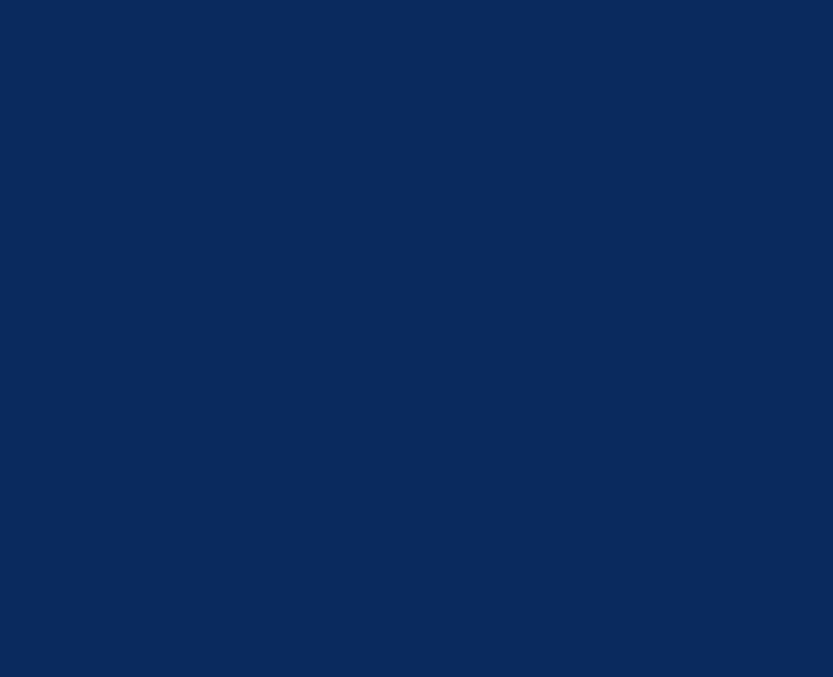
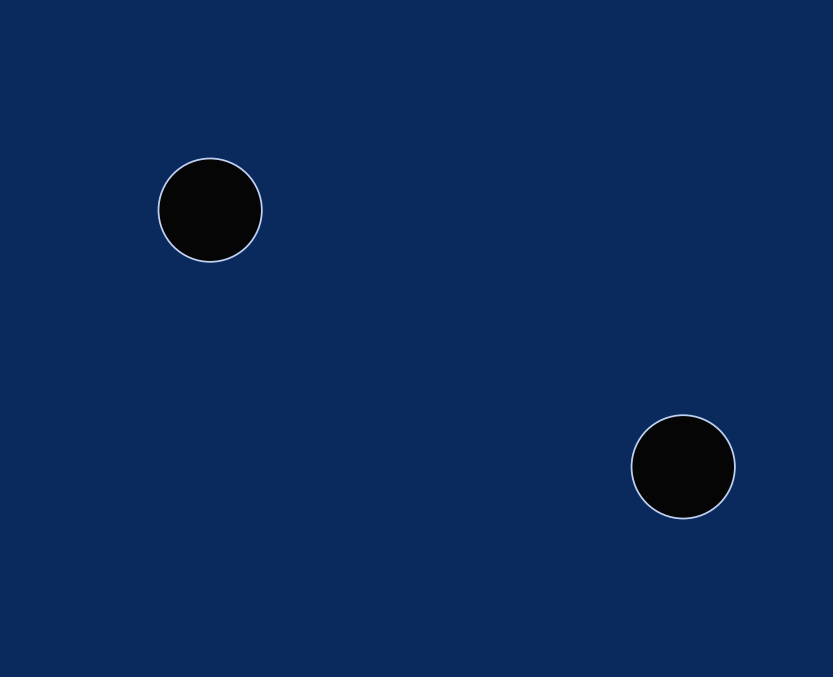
part: none -> (210, 210)
part: none -> (683, 466)

